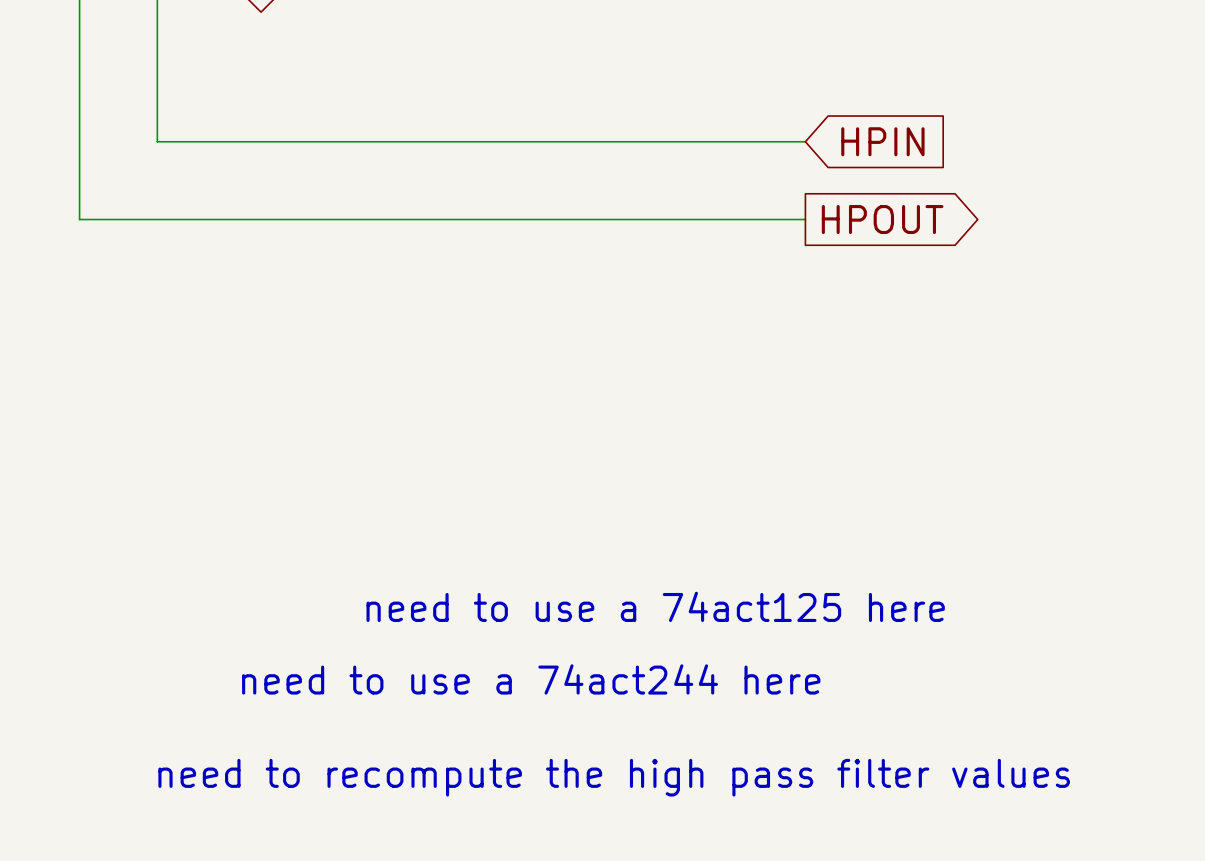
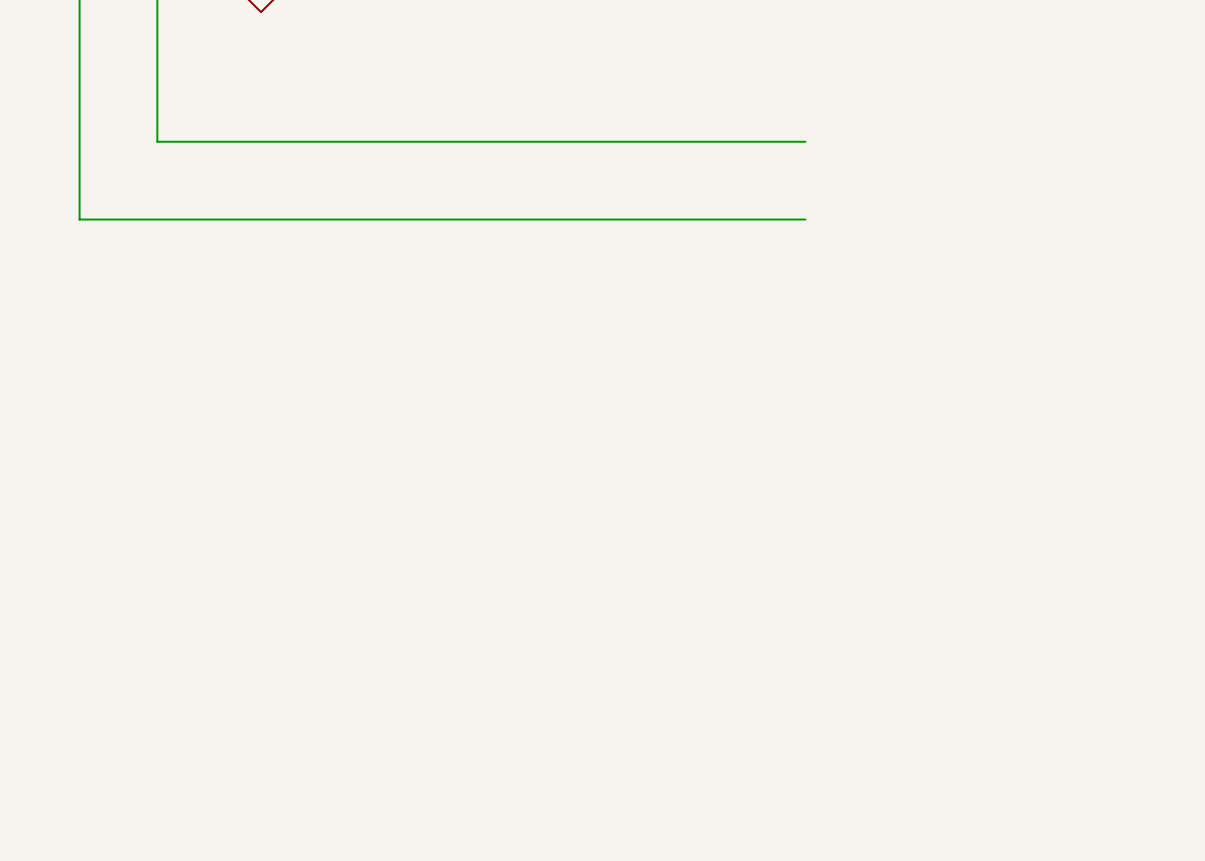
global label: HPIN (882, 141) -> none
global label: HPOUT (882, 219) -> none
text: need to use a 74act125 here (655, 606) -> none
text: need to use a 74act244 here (531, 679) -> none
text: need to recompute the high pass filter values (614, 777) -> none

